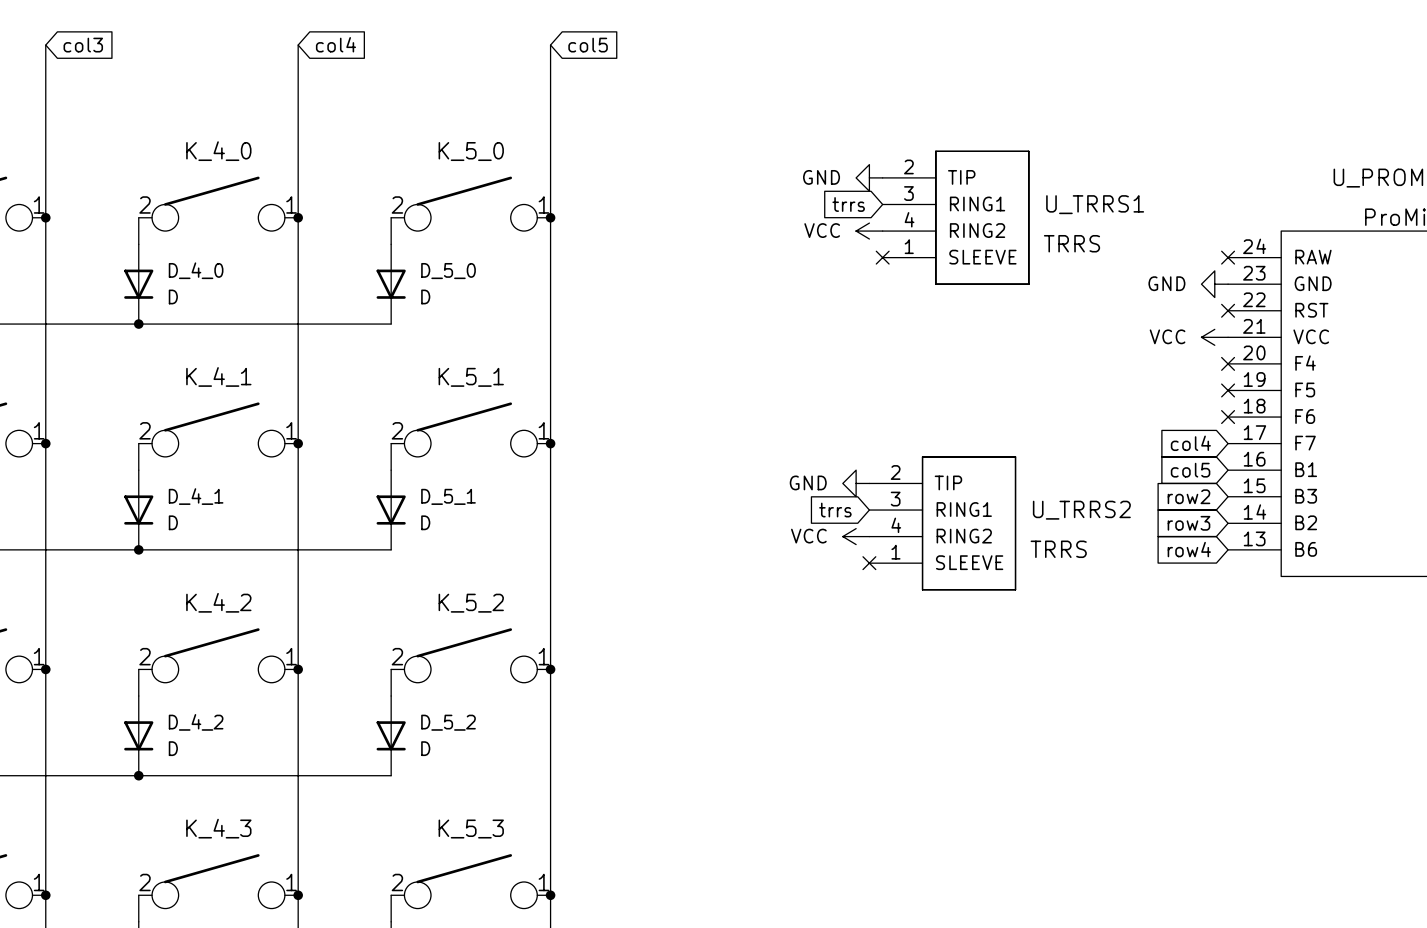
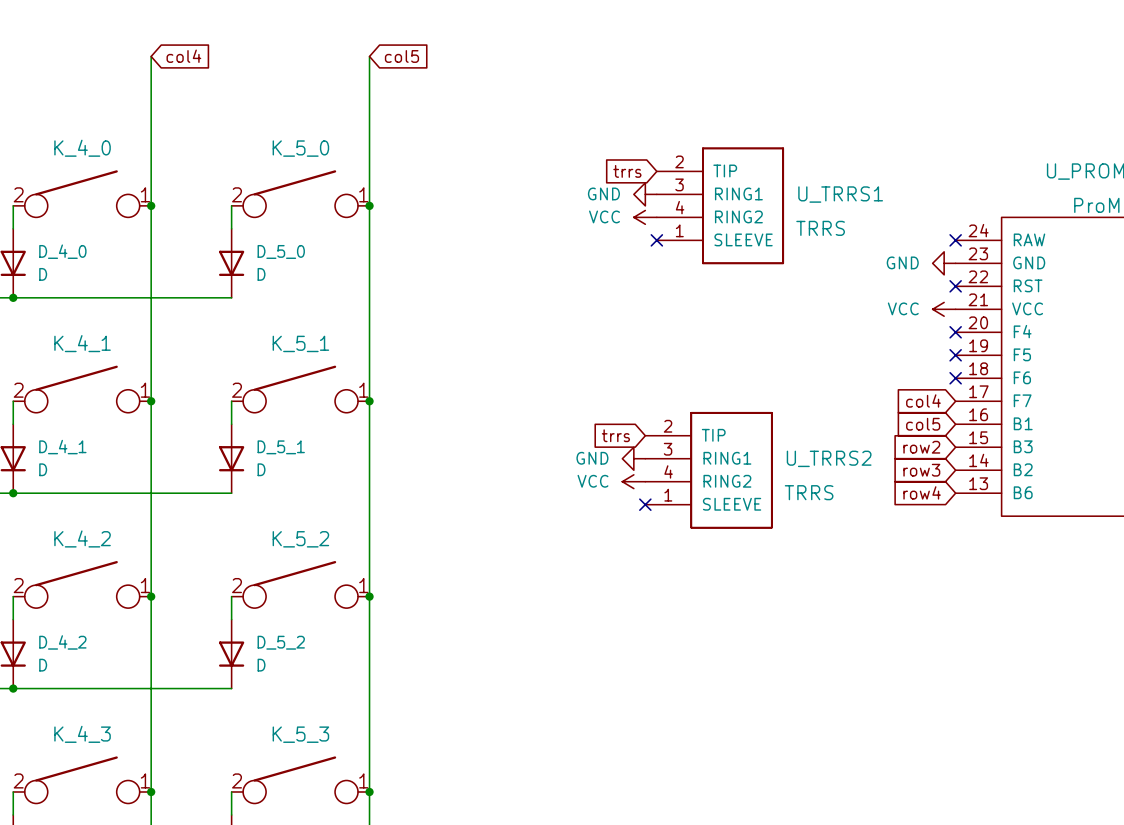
power symbol position: GND (869, 177) -> GND (645, 194)
global label position: trrs (848, 204) -> trrs (627, 171)
power symbol position: GND (856, 483) -> GND (633, 458)
global label position: trrs (835, 510) -> trrs (615, 435)

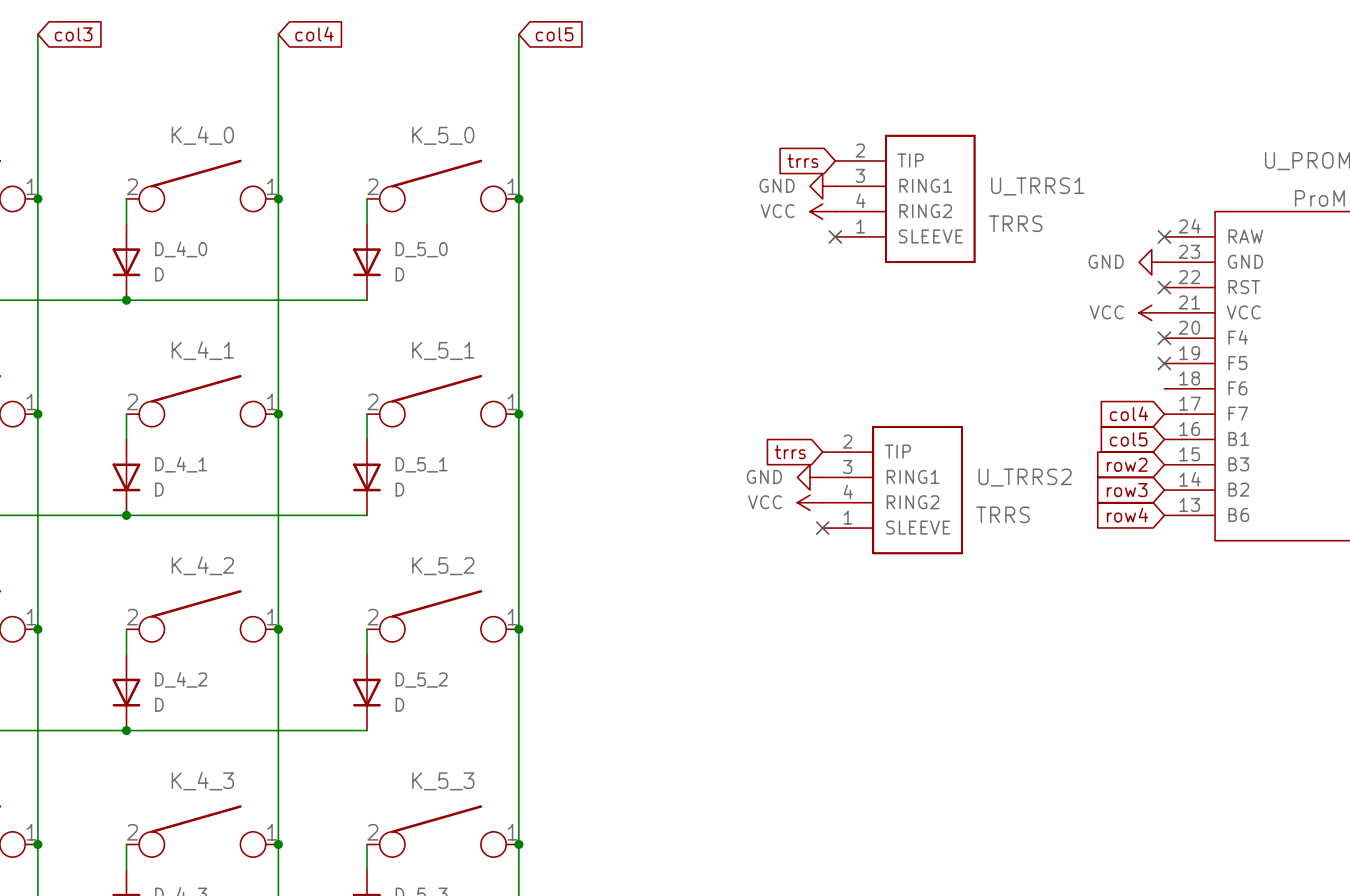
no-connect mark: (955, 378) -> none

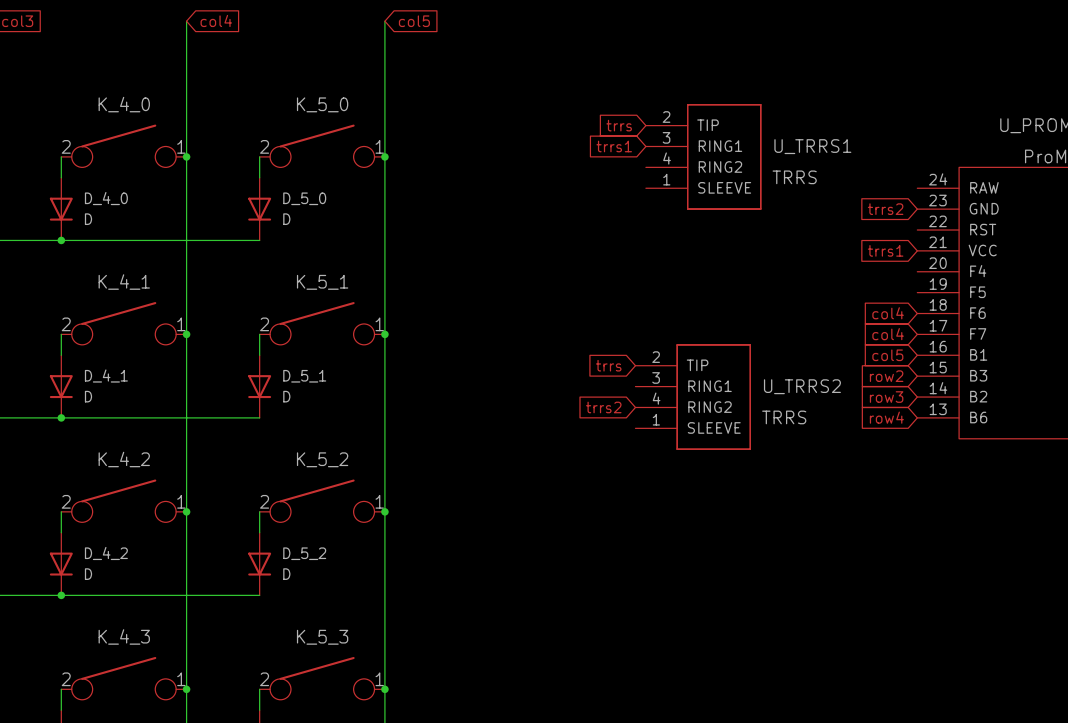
global label: none -> trrs1 (614, 146)
power symbol: GND (822, 186) -> none
power symbol: VCC (822, 211) -> none
no-connect mark: (835, 236) -> none
no-connect mark: (1164, 236) -> none
global label: none -> trrs2 (885, 209)
power symbol: GND (1151, 262) -> none
no-connect mark: (1164, 287) -> none
global label: none -> trrs1 (885, 250)
power symbol: VCC (1151, 312) -> none
no-connect mark: (1164, 338) -> none
no-connect mark: (1164, 363) -> none
global label: none -> col4 (888, 313)
power symbol: GND (810, 477) -> none
global label: none -> trrs2 (603, 407)
power symbol: VCC (810, 502) -> none
no-connect mark: (822, 528) -> none

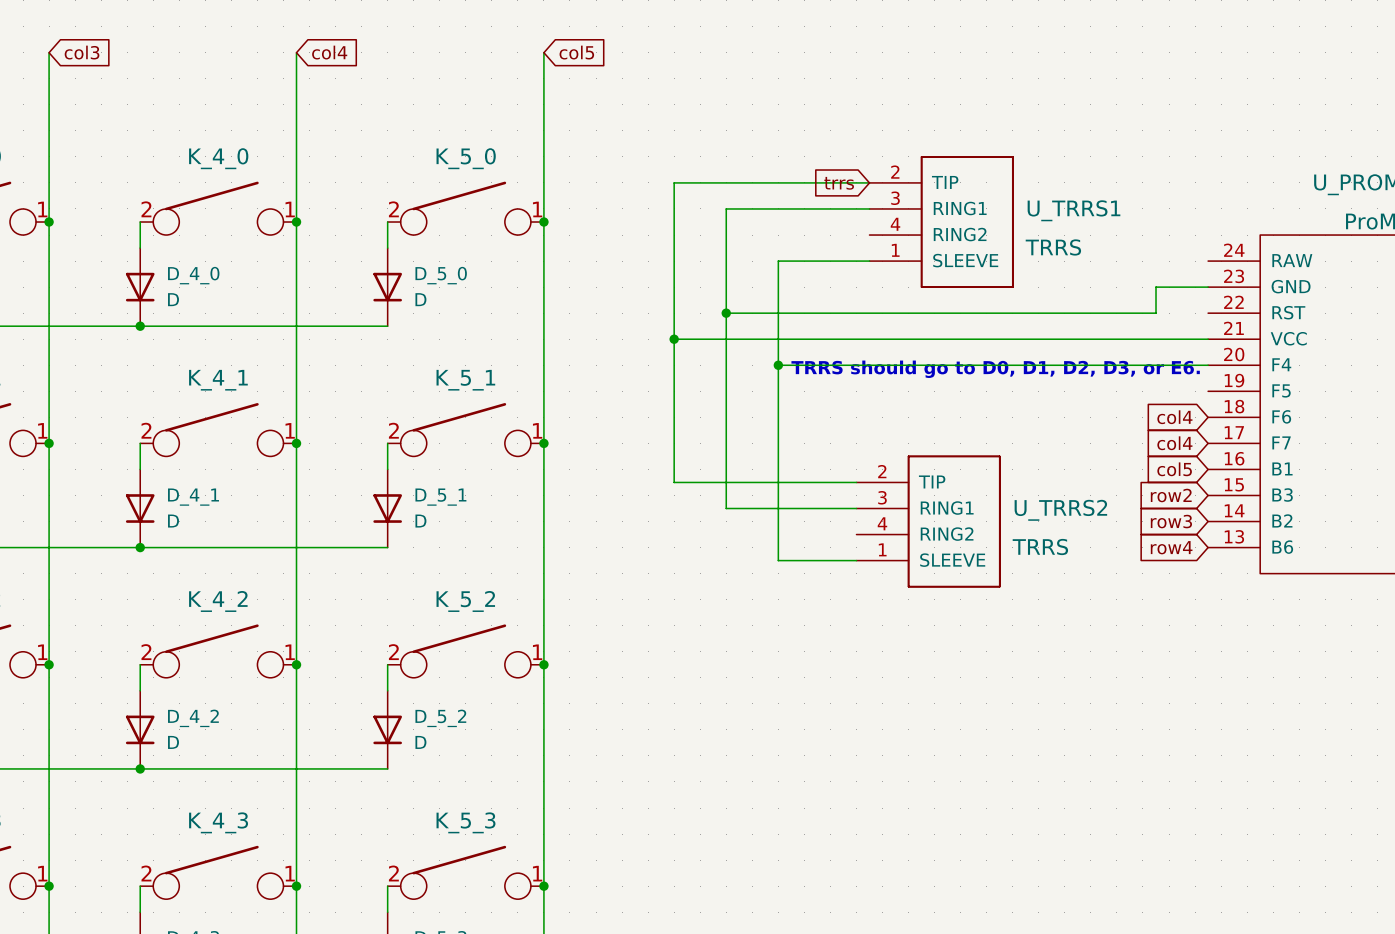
wire: none -> (869, 182) (674, 182) (674, 482) (856, 482)
global label: trrs1 (614, 146) -> none
wire: none -> (869, 208) (726, 208) (726, 508) (856, 508)
wire: none -> (869, 261) (778, 261) (778, 560) (856, 560)
global label: trrs2 (885, 209) -> none
wire: none -> (1208, 287) (1156, 287) (1156, 313) (726, 313)
junction: none -> (726, 313)
wire: none -> (674, 339) (1208, 339)
junction: none -> (674, 339)
global label: trrs1 (885, 250) -> none
wire: none -> (778, 365) (1208, 365)
junction: none -> (778, 365)
text: none -> TRRS should go to D0, D1, D2, D3, or E6. (995, 369)
global label: trrs (608, 365) -> none
global label: trrs2 (603, 407) -> none

